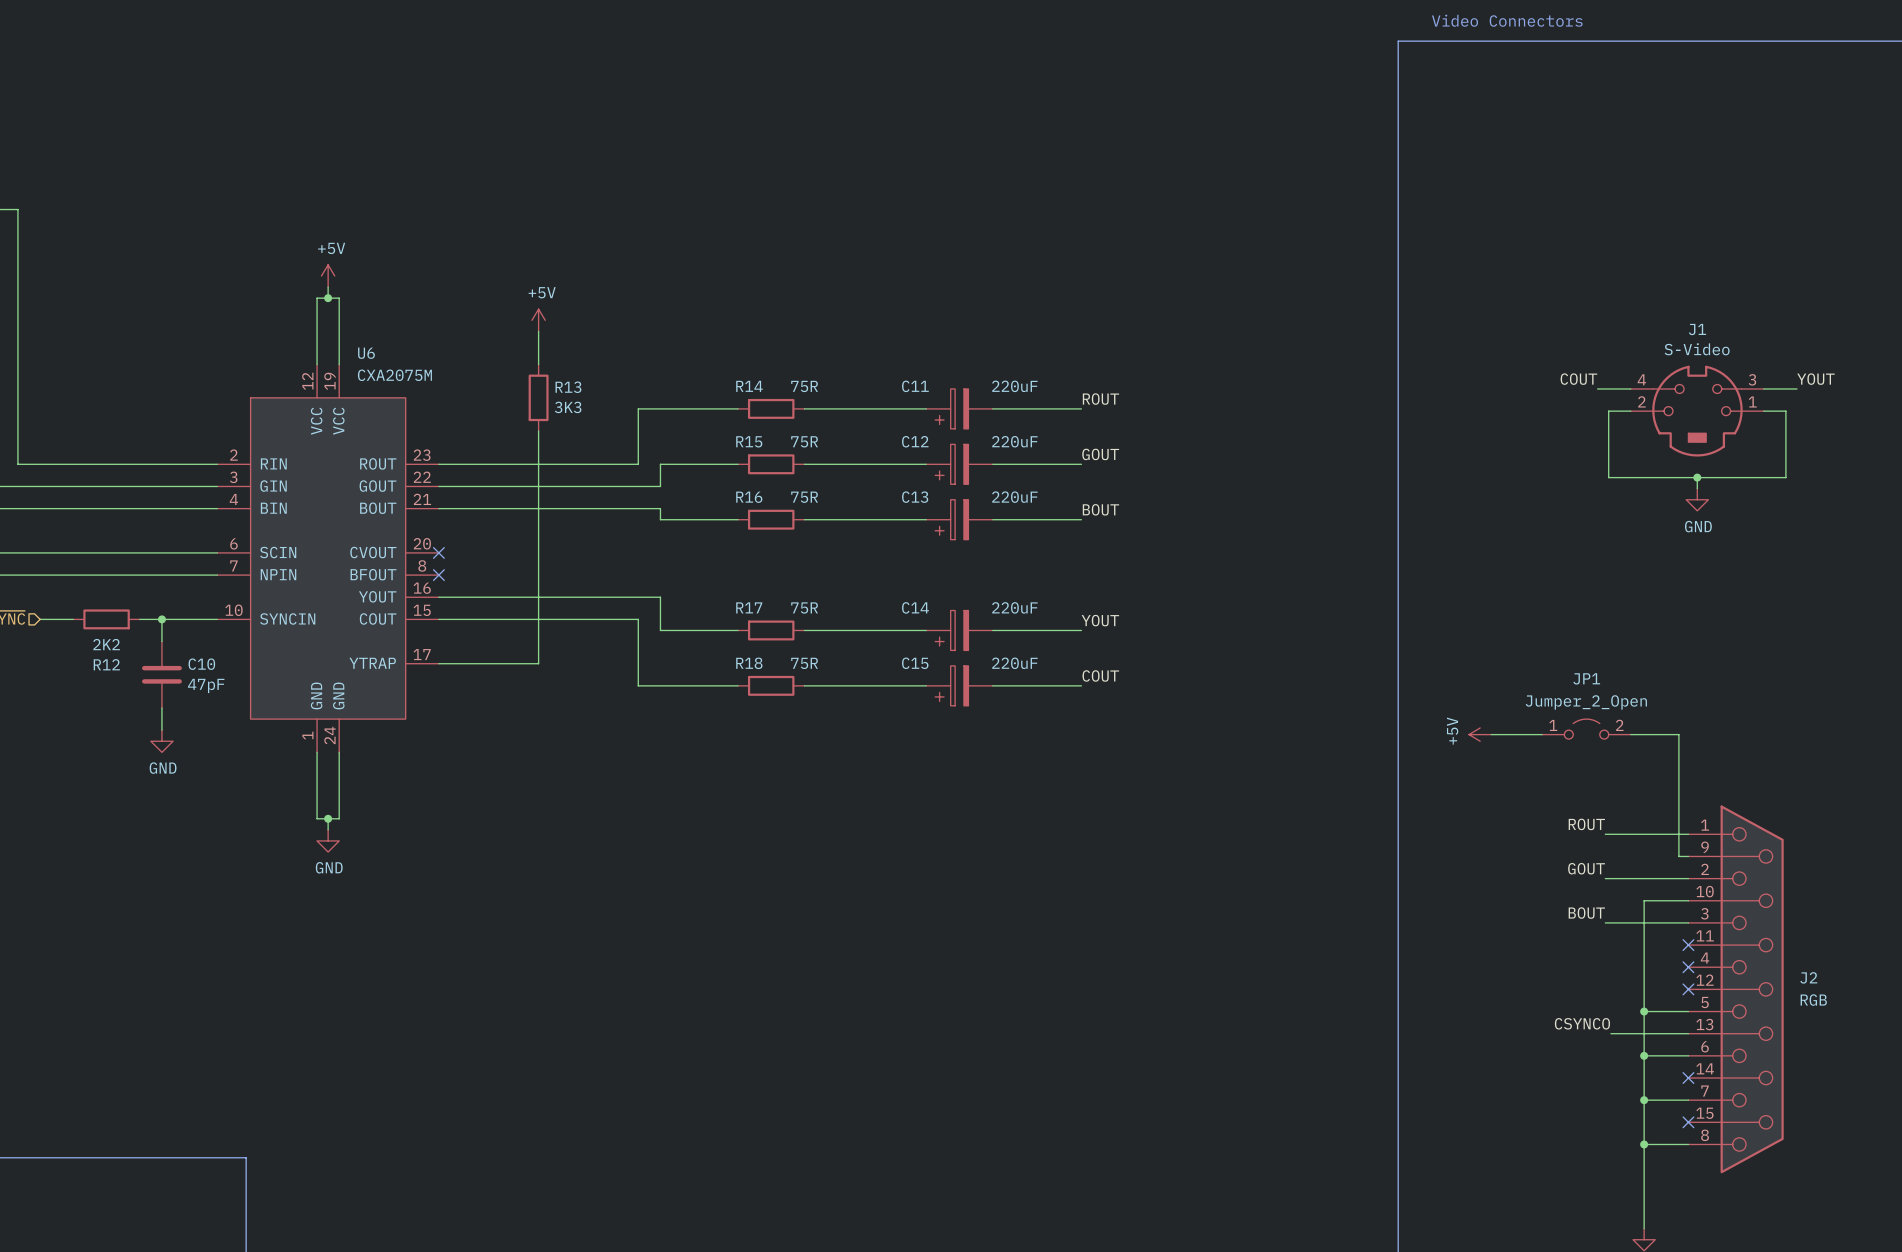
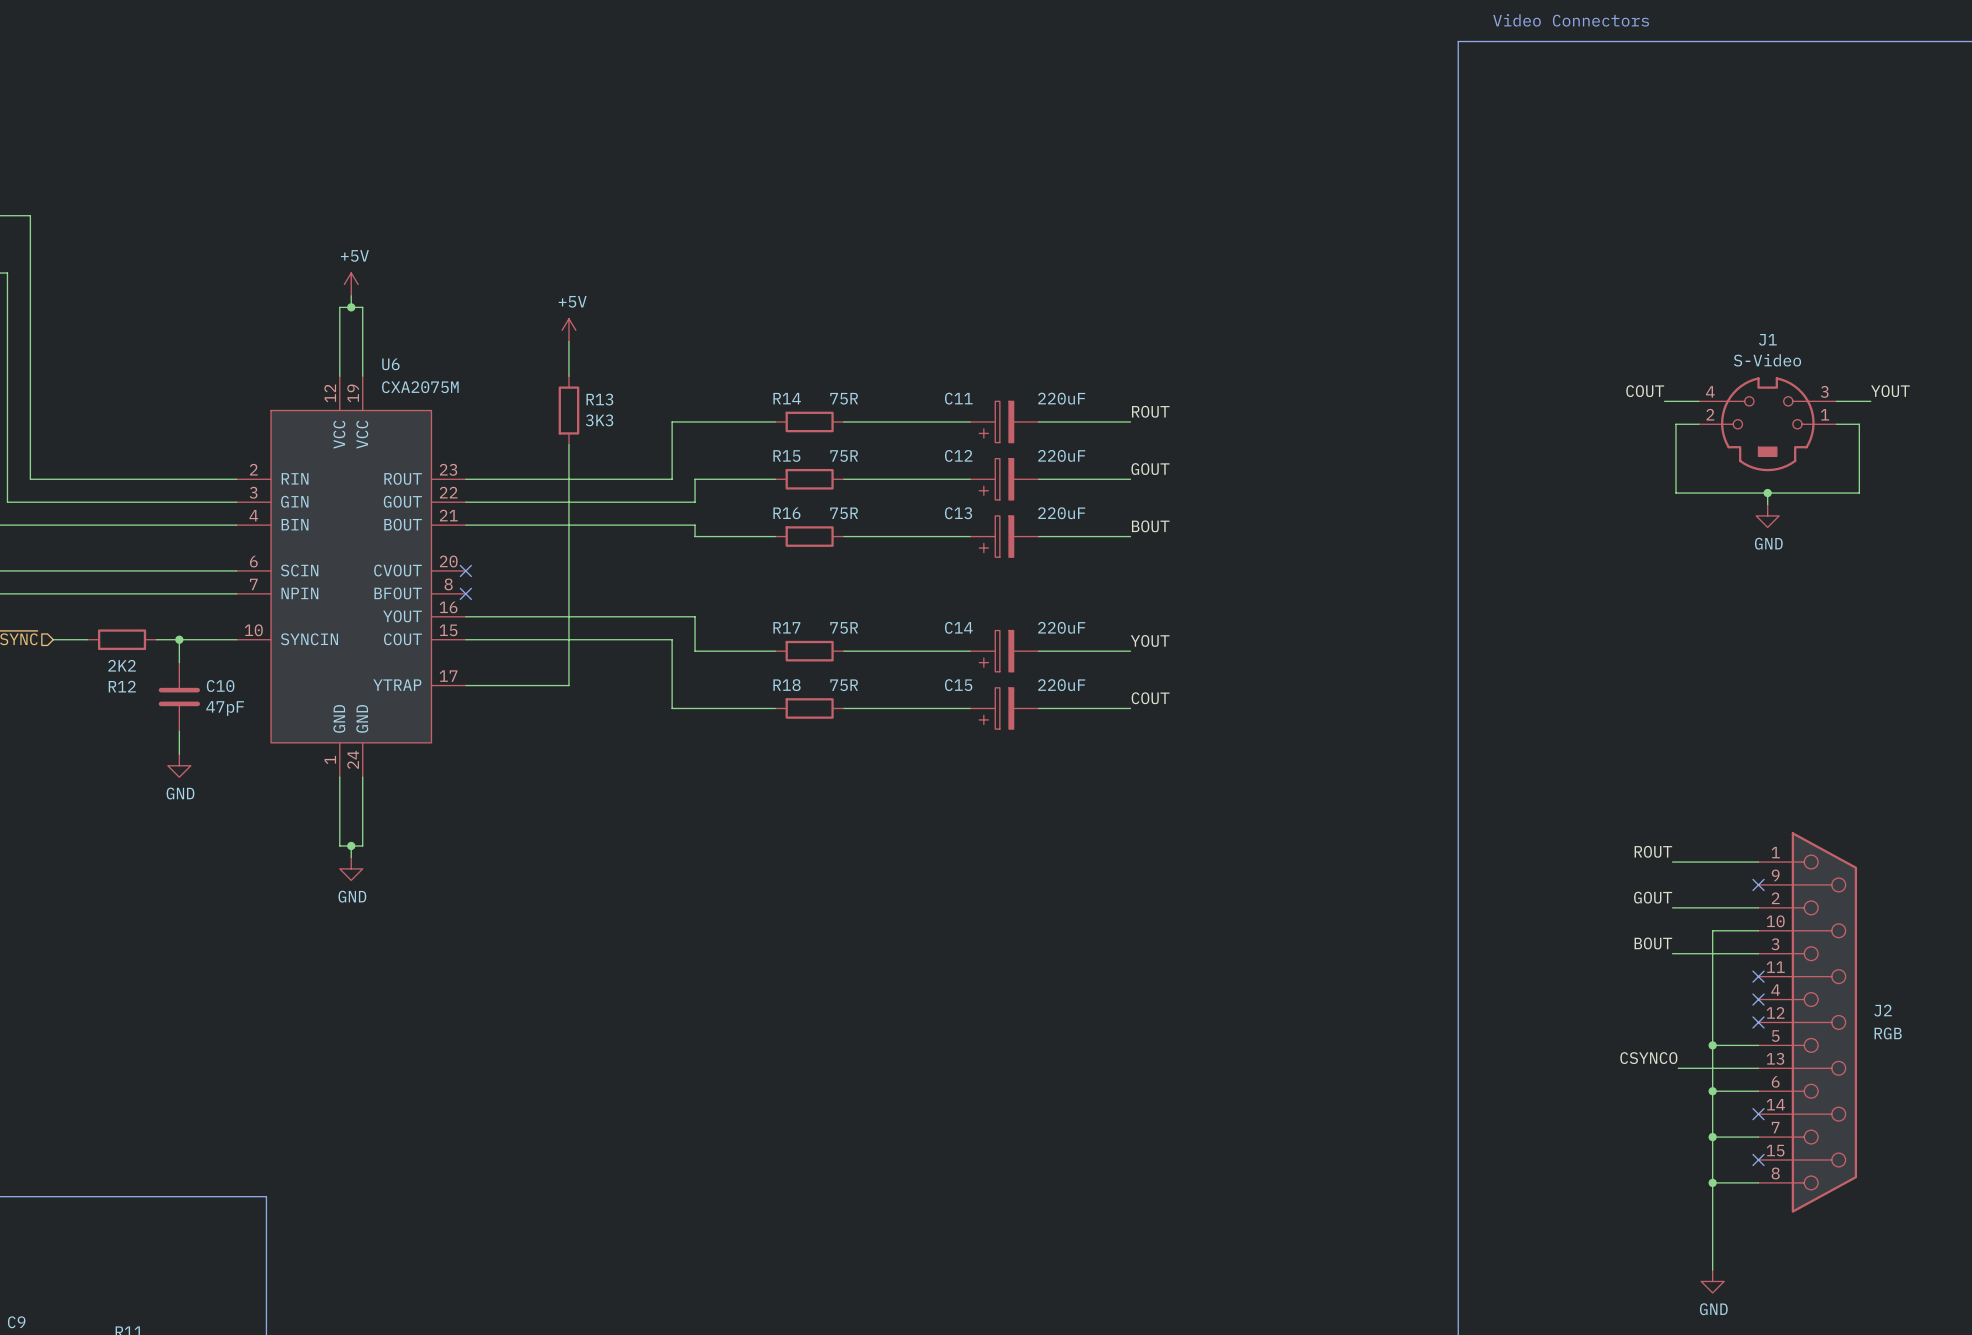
JP1: Jumper_2_Open (1586, 729) -> none
power symbol: +5V (1480, 734) -> none
wire: (1491, 734) (1542, 734) -> none
wire: (1630, 734) (1678, 734) (1678, 856) (1688, 856) -> none
no-connect mark: none -> (1758, 884)

